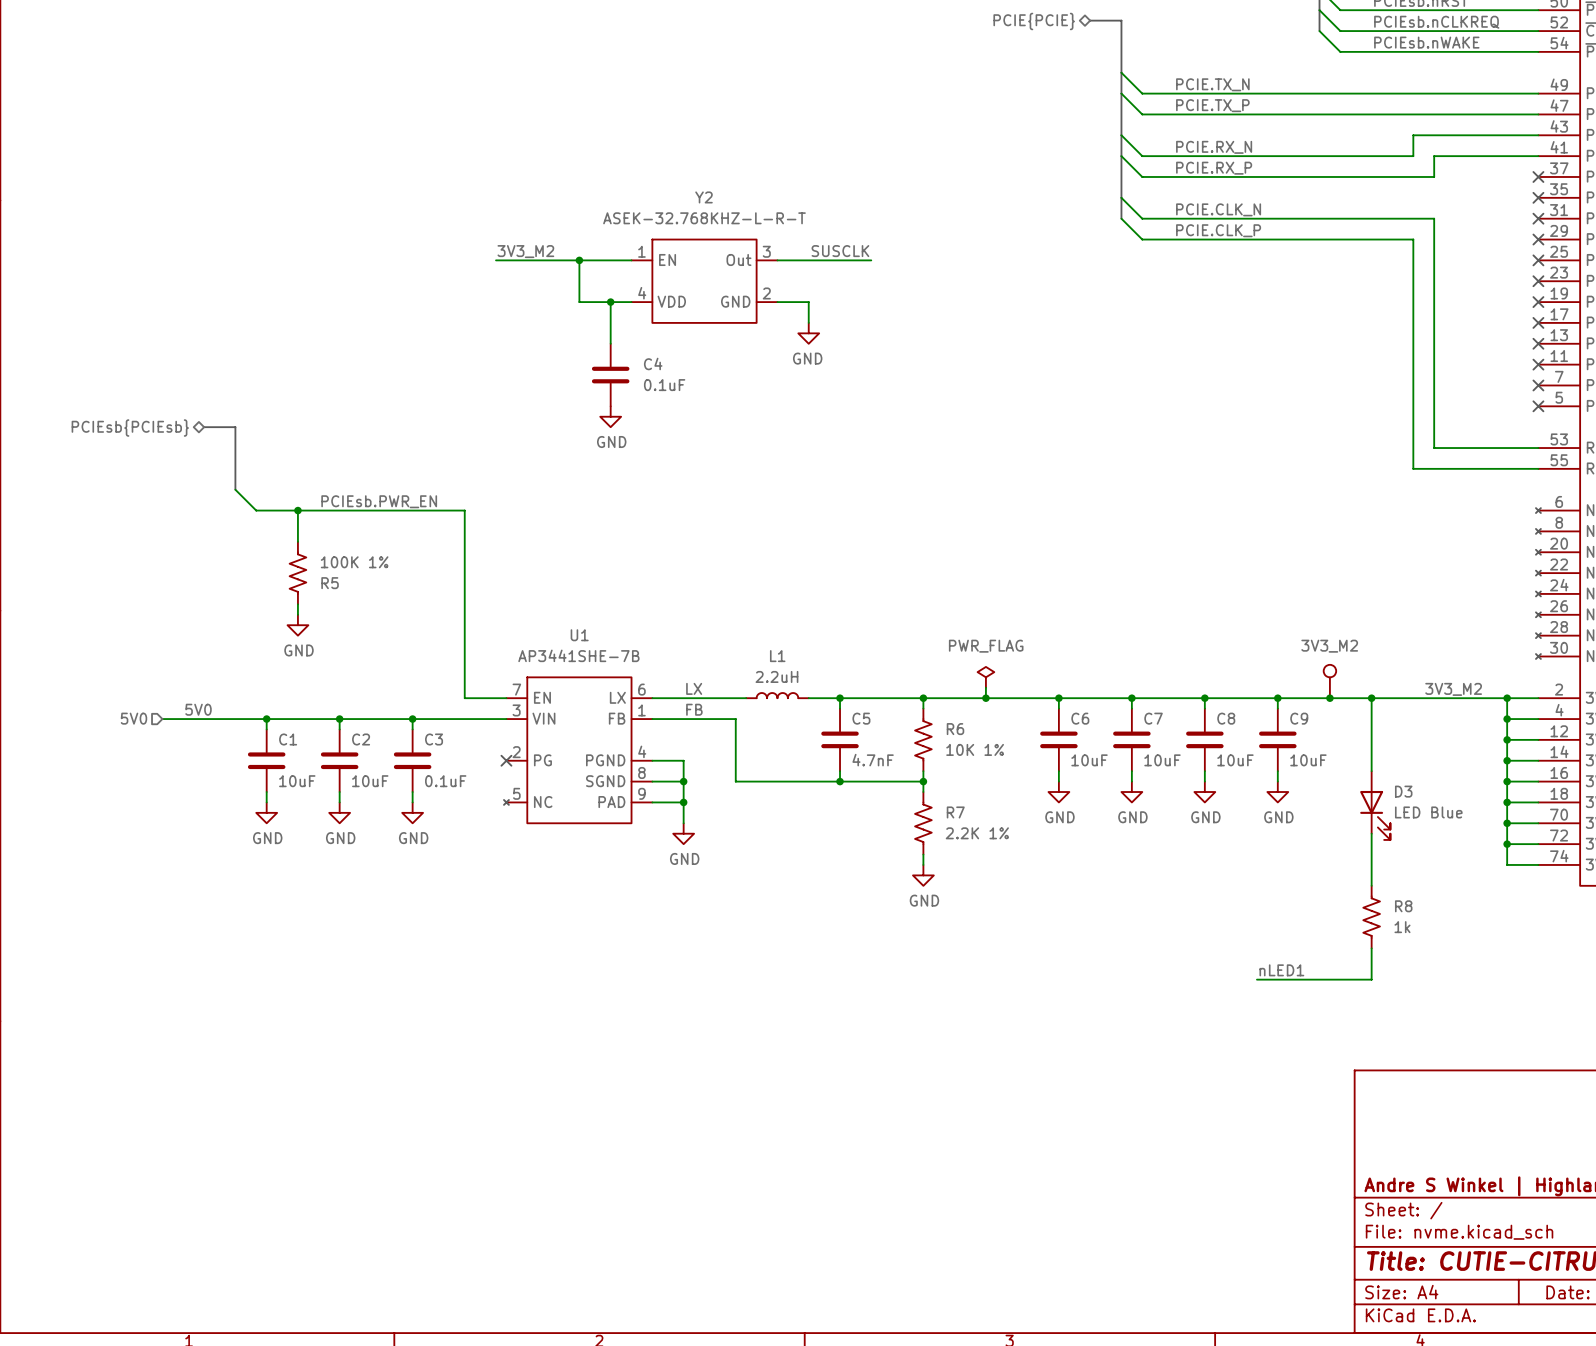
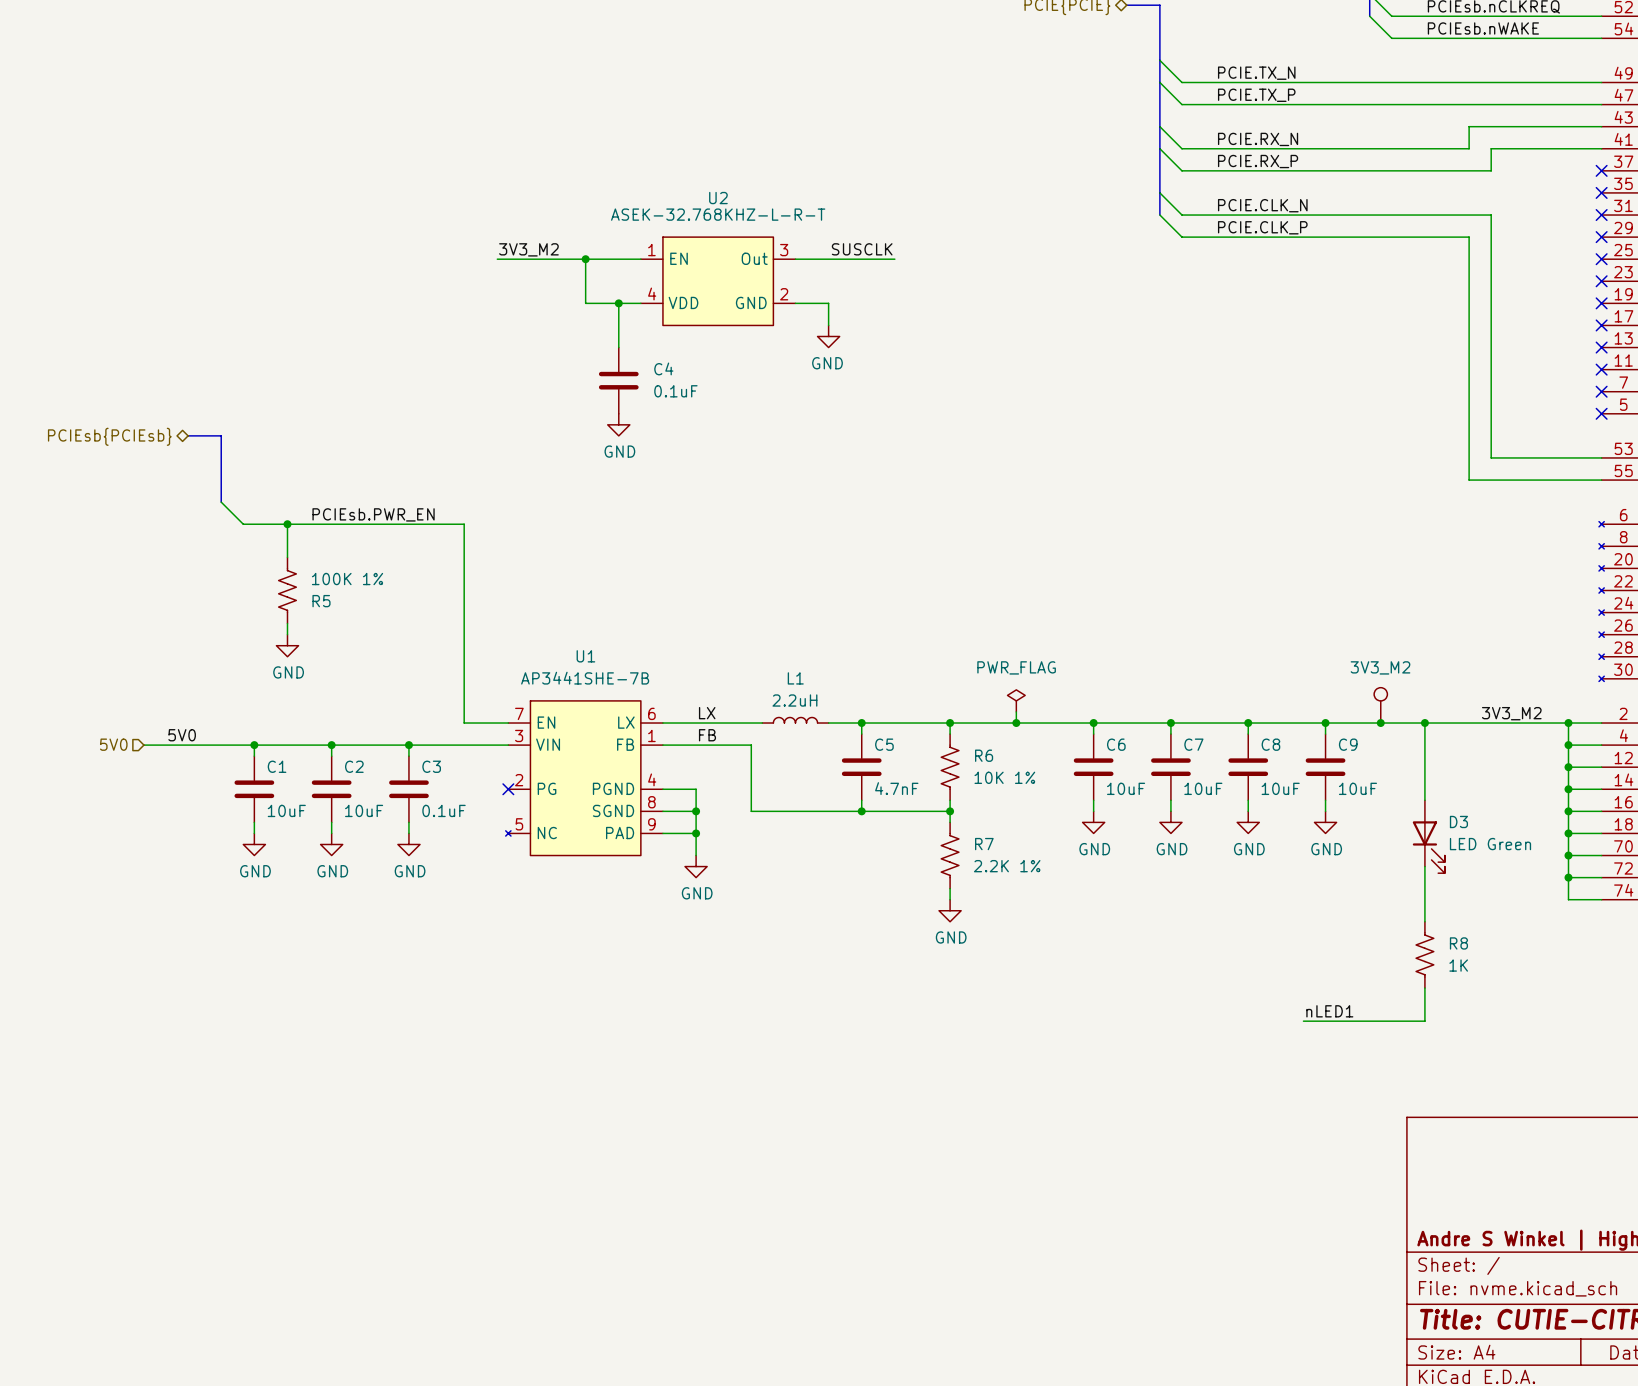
Y2 name: Y2 (704, 197) -> U2 (718, 198)
D3 value: LED Blue (1428, 812) -> LED Green (1490, 844)
R8 value: 1k (1402, 927) -> 1K (1458, 965)

